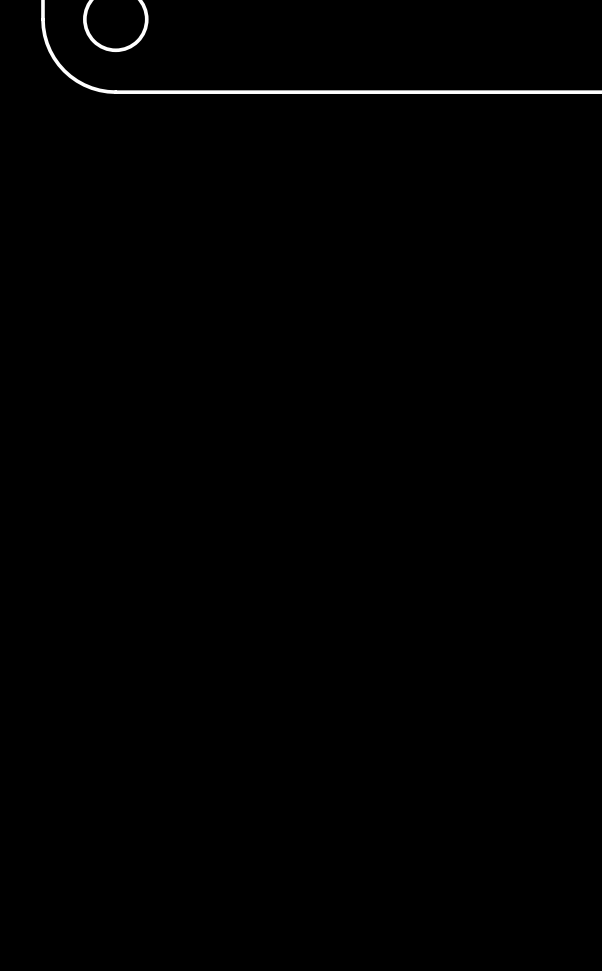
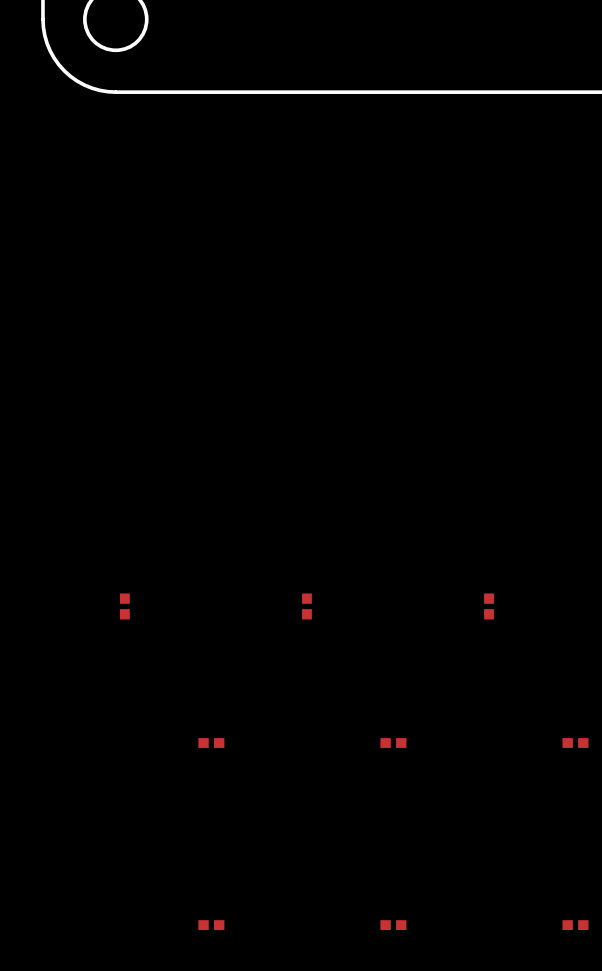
part: none -> (124, 606)
part: none -> (306, 606)
part: none -> (489, 606)
part: none -> (211, 743)
part: none -> (393, 743)
part: none -> (575, 743)
part: none -> (211, 925)
part: none -> (393, 925)
part: none -> (575, 925)

